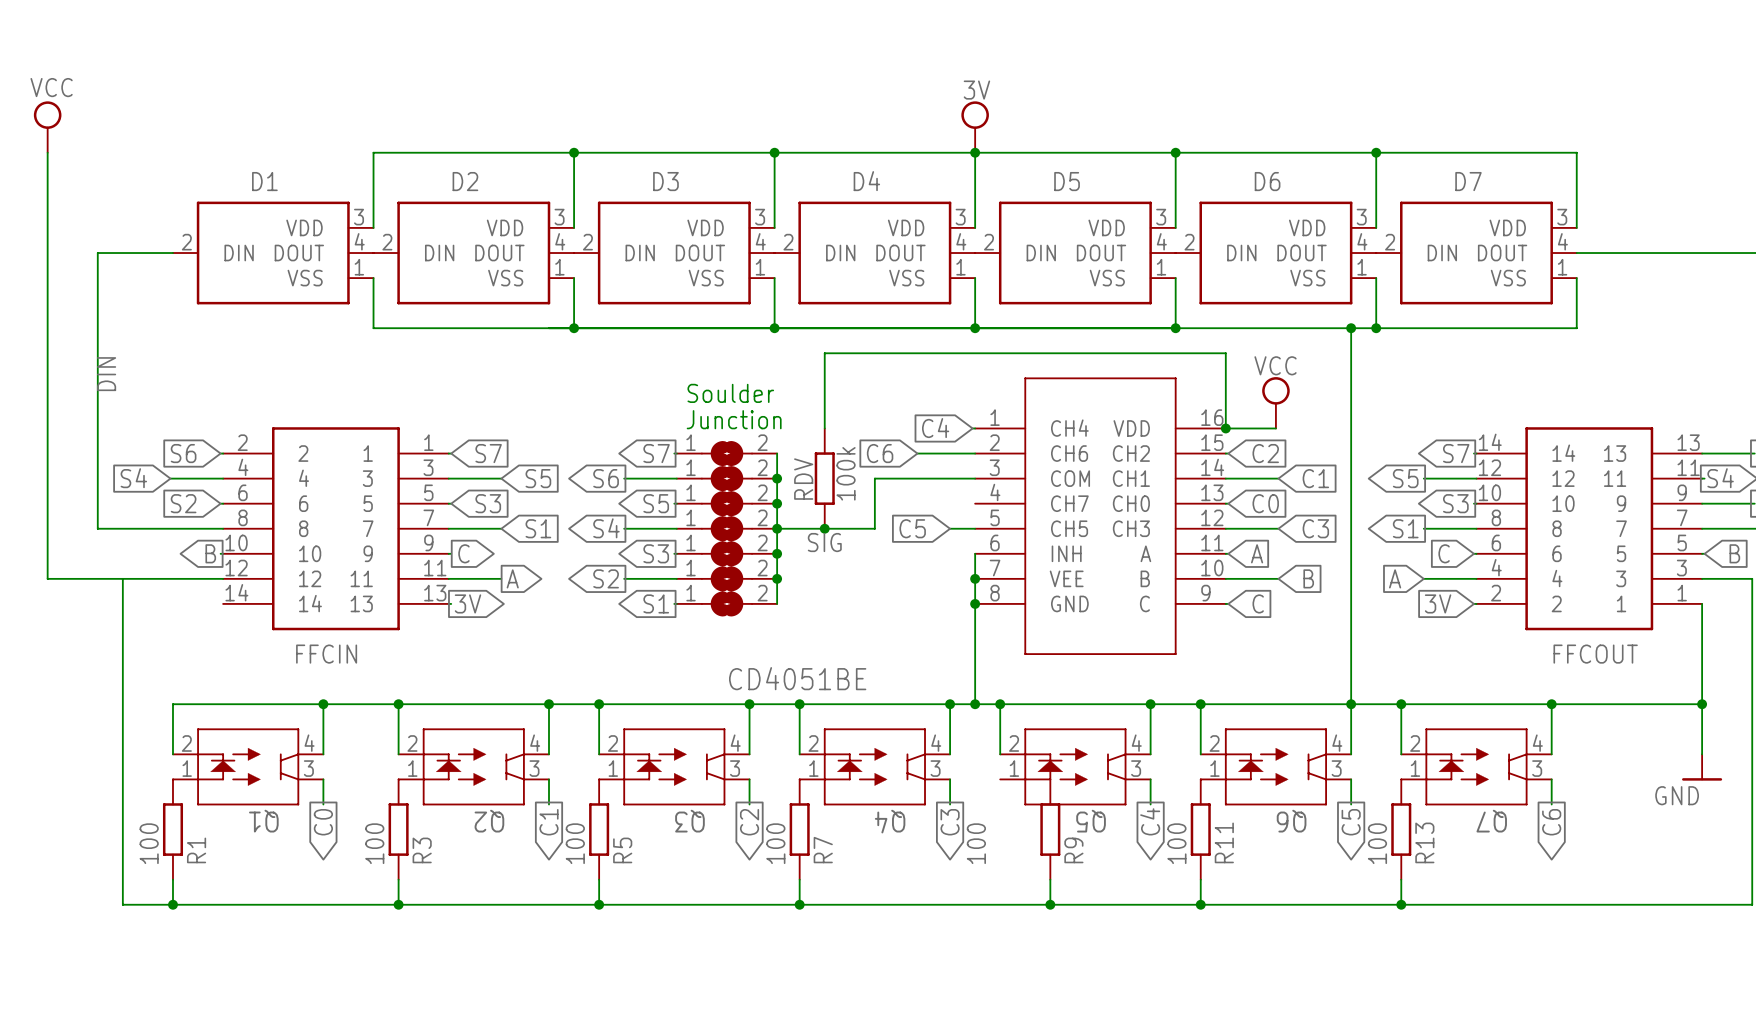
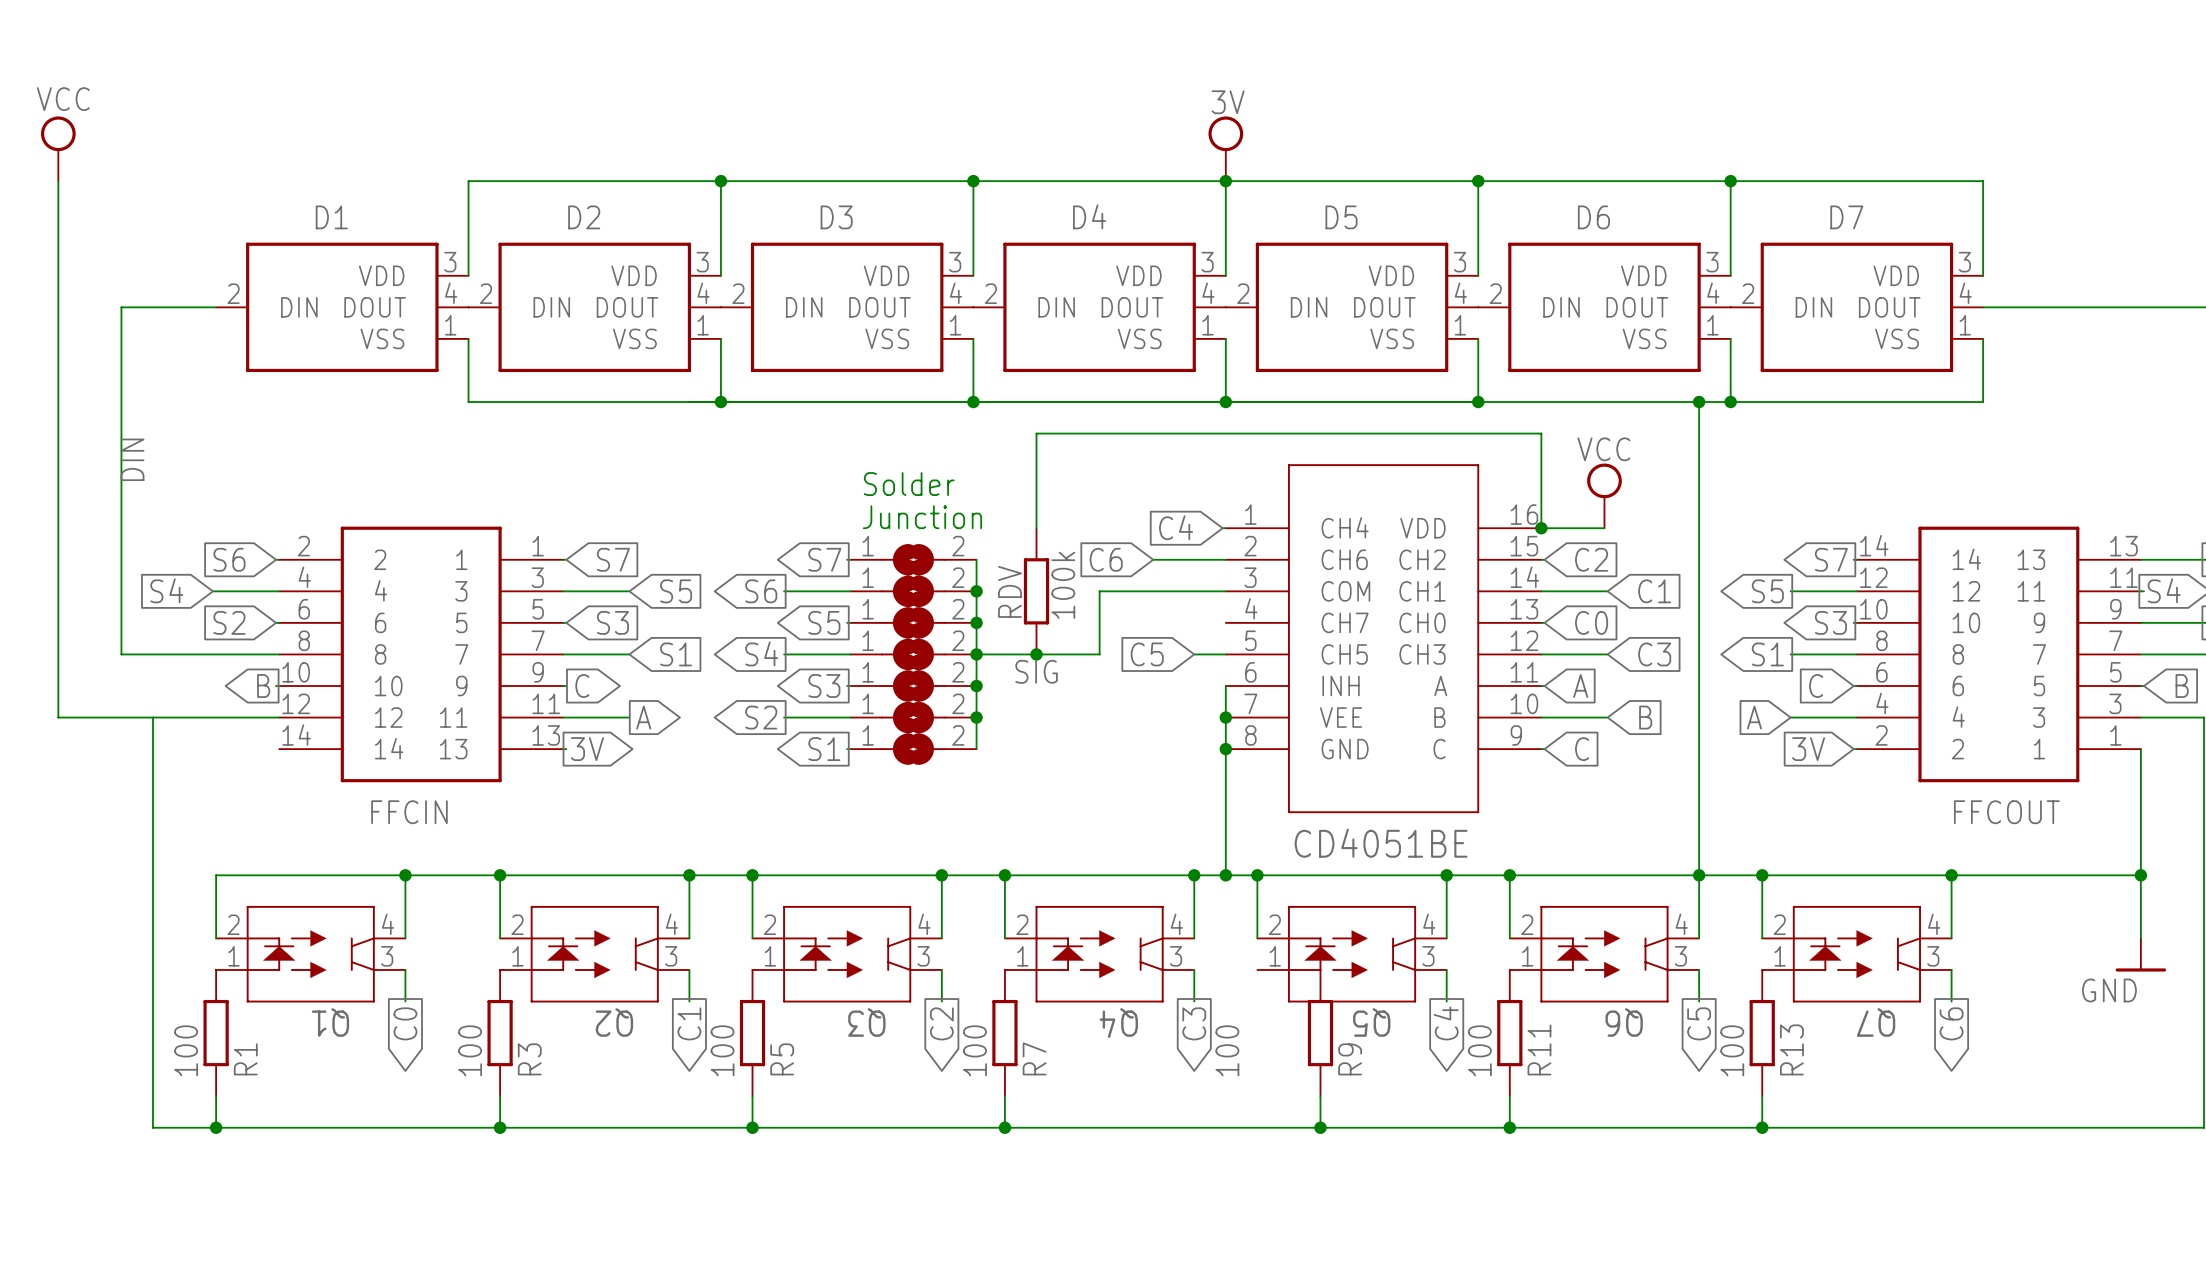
text: Soulder (730, 393) -> Solder (909, 484)
part value position: CD4051BE (797, 678) -> CD4051BE (1381, 843)

